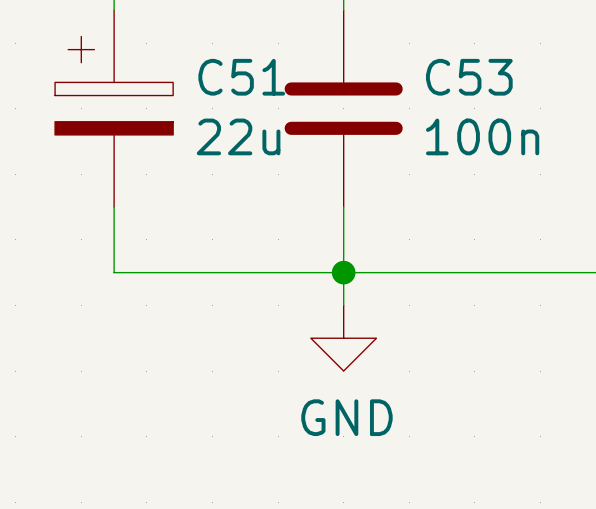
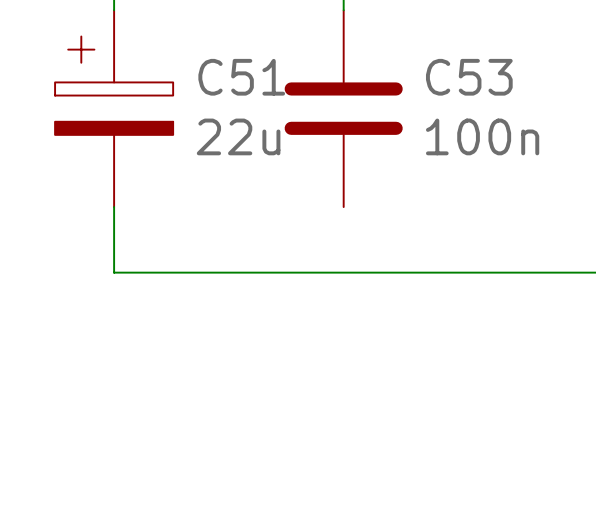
wire: (343, 207) (343, 305) -> none
junction: (343, 272) -> none
power symbol: GND (343, 338) -> none

